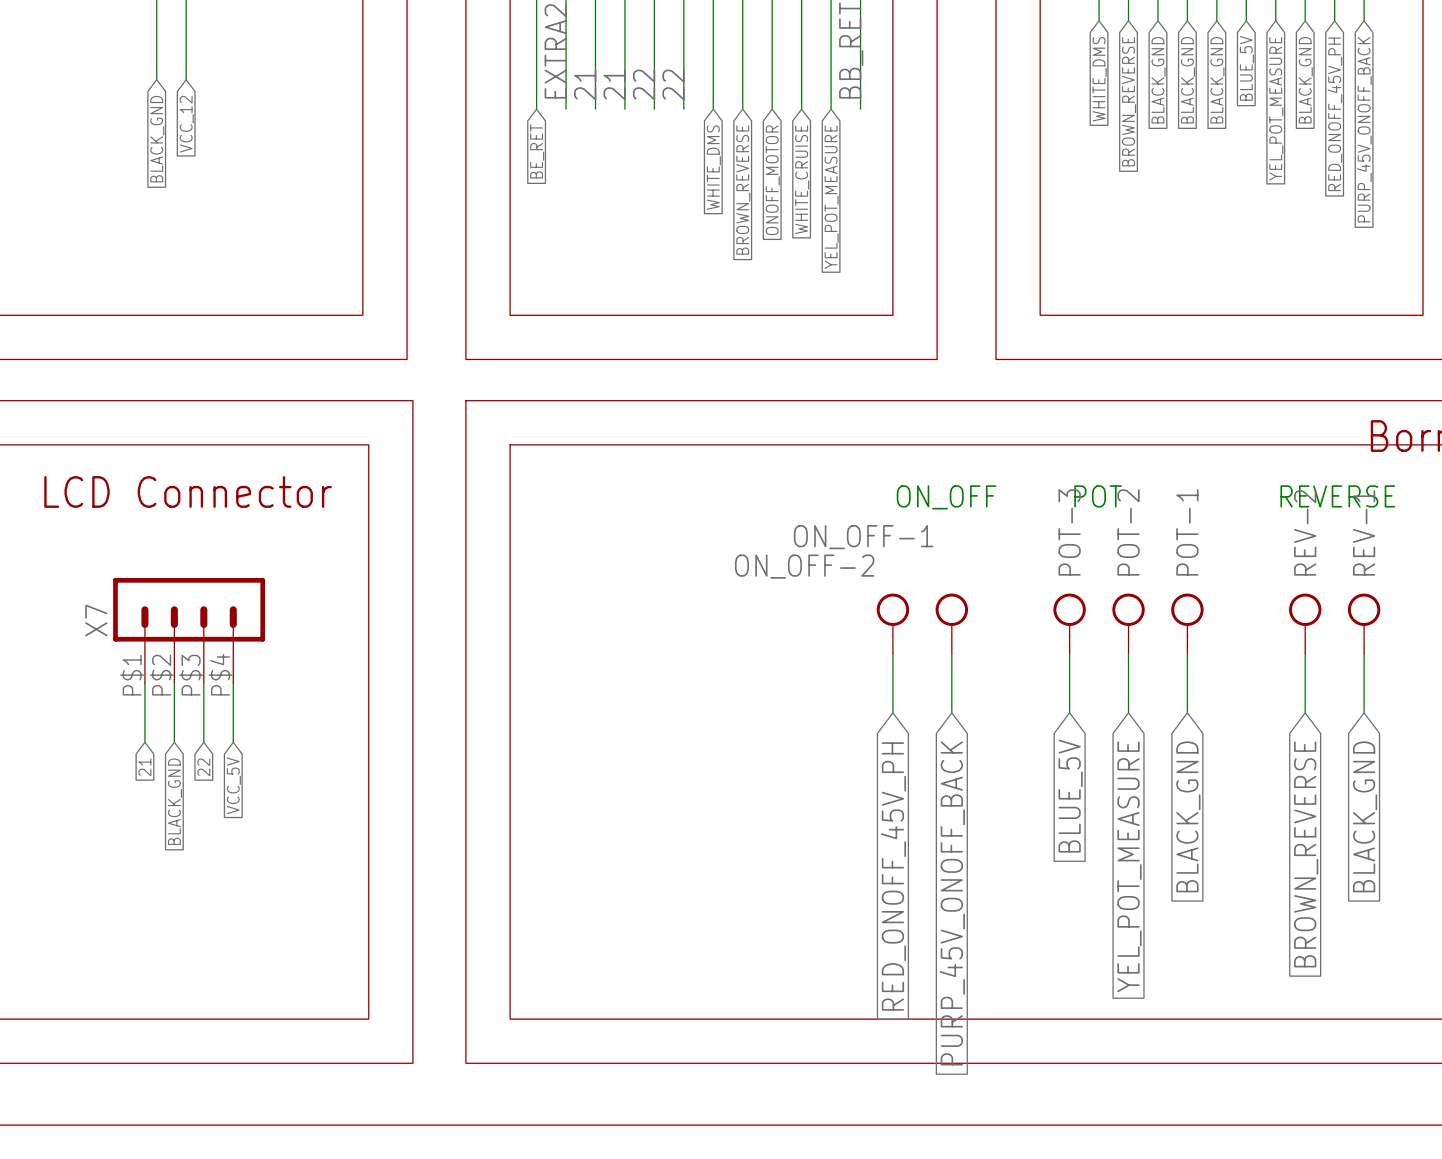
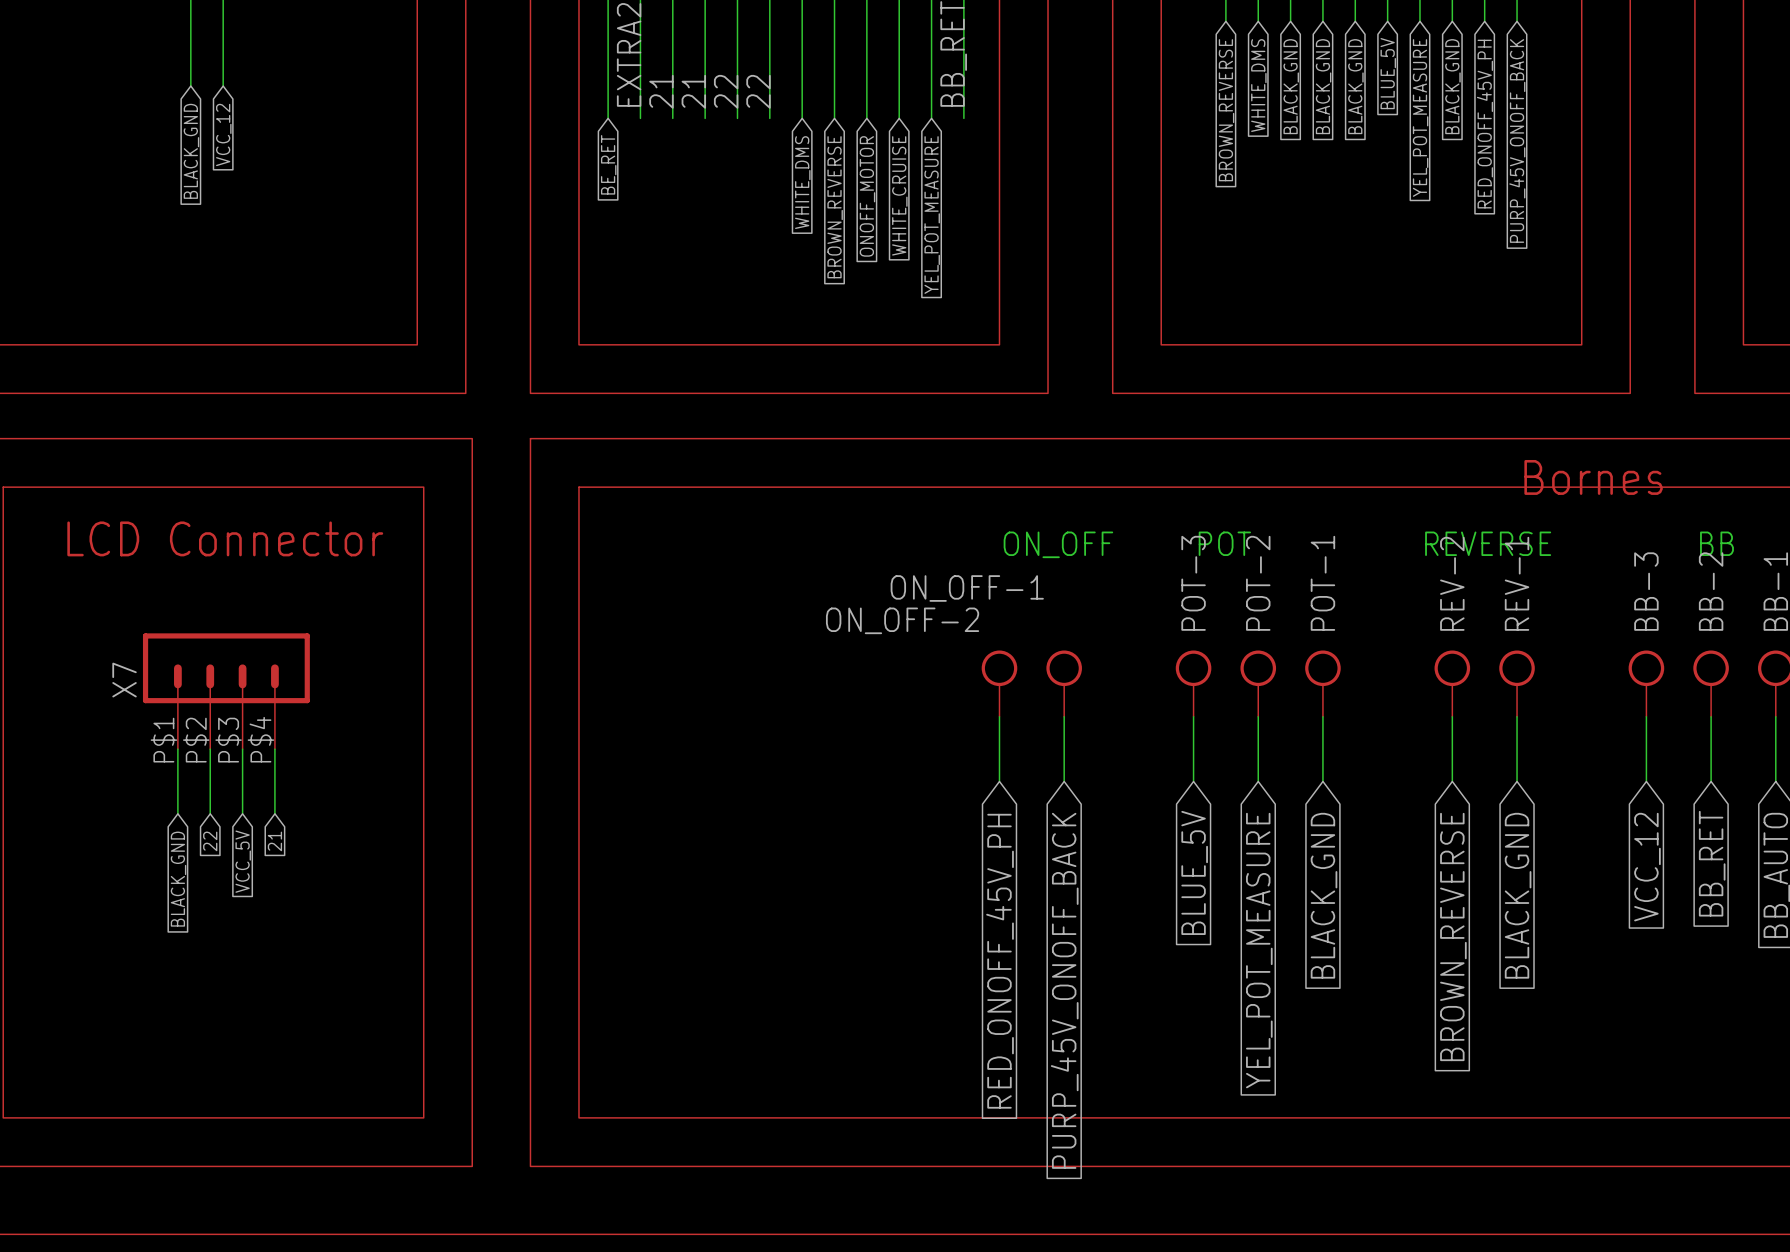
global label: WHITE_DMS (1099, 79) -> BROWN_REVERSE (1226, 110)
global label: BROWN_REVERSE (1129, 101) -> WHITE_DMS (1258, 85)
global label: 21 (144, 767) -> BLACK_GND (178, 879)
global label: 22 (203, 767) -> VCC_5V (243, 861)
global label: VCC_5V (233, 785) -> 21 (274, 841)
global label: BLACK_GND (174, 801) -> 22 (210, 841)

